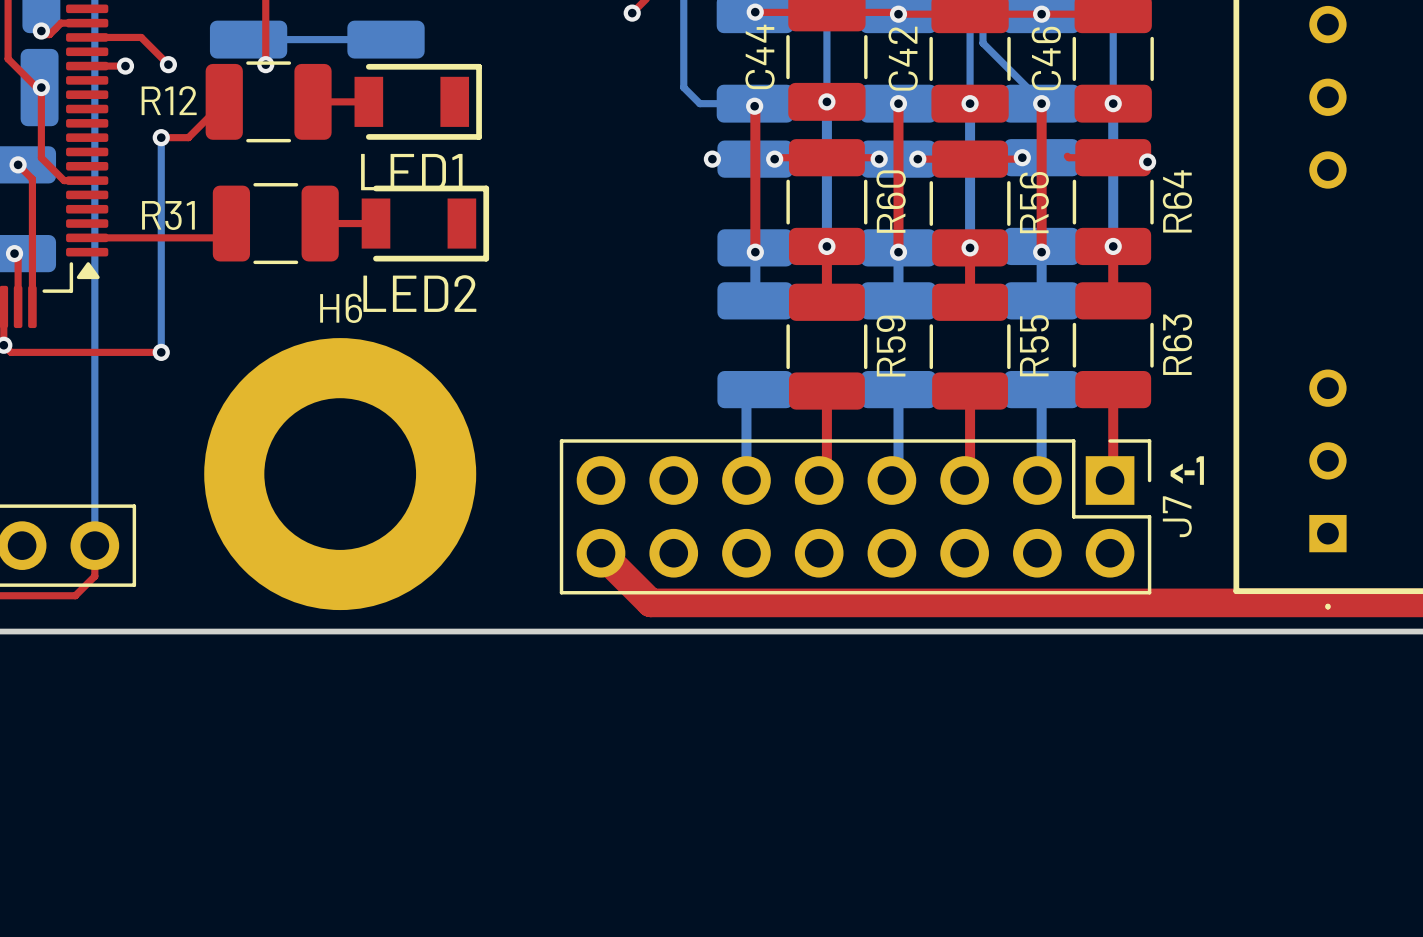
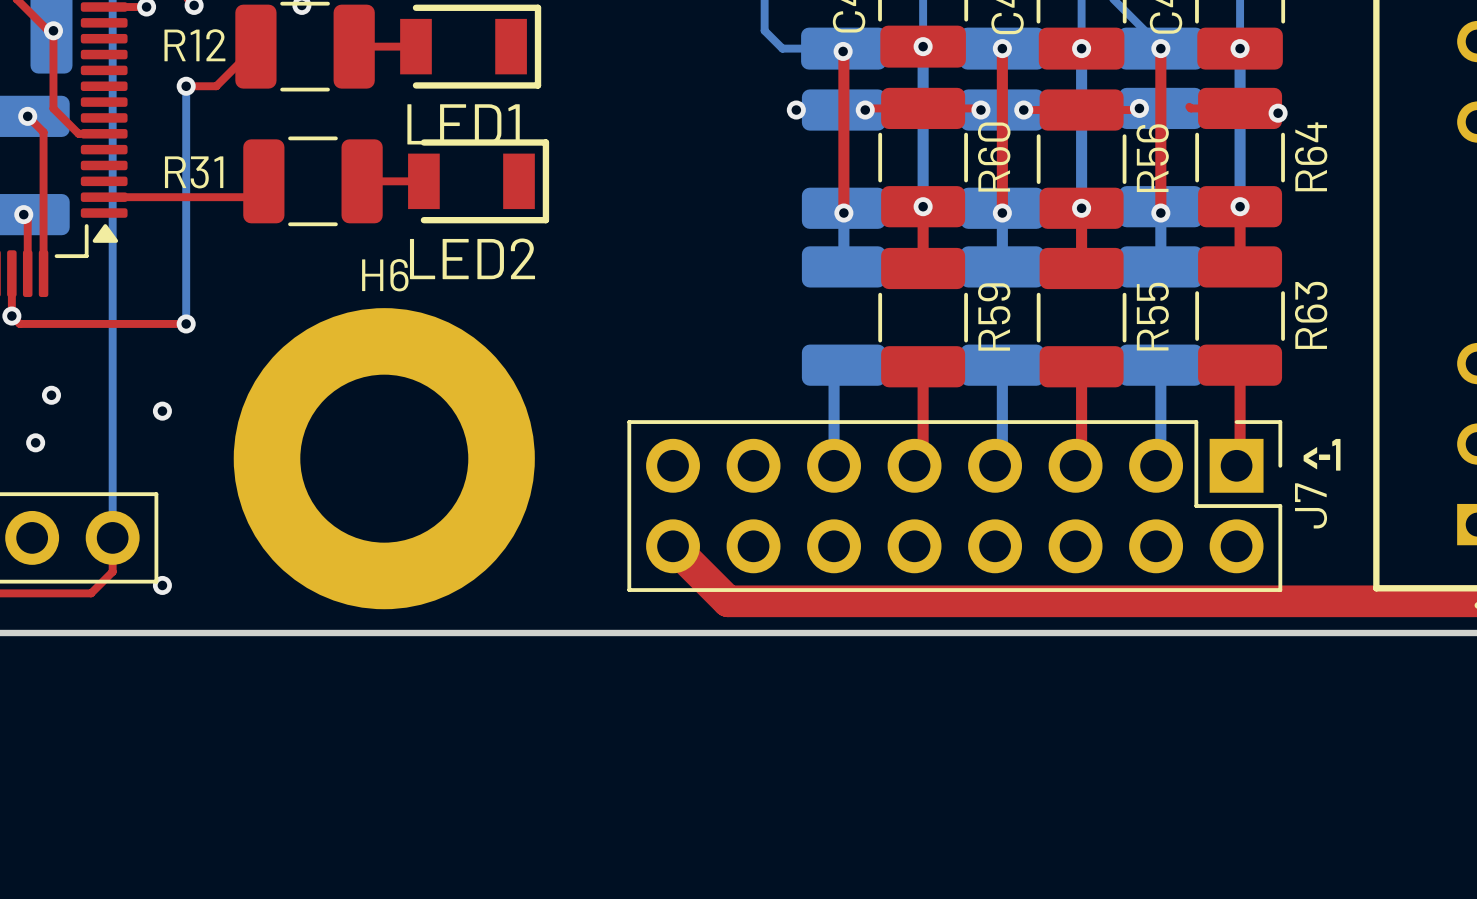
via: none -> (51, 395)
via: none -> (162, 411)
via: none -> (35, 442)
via: none -> (162, 585)

